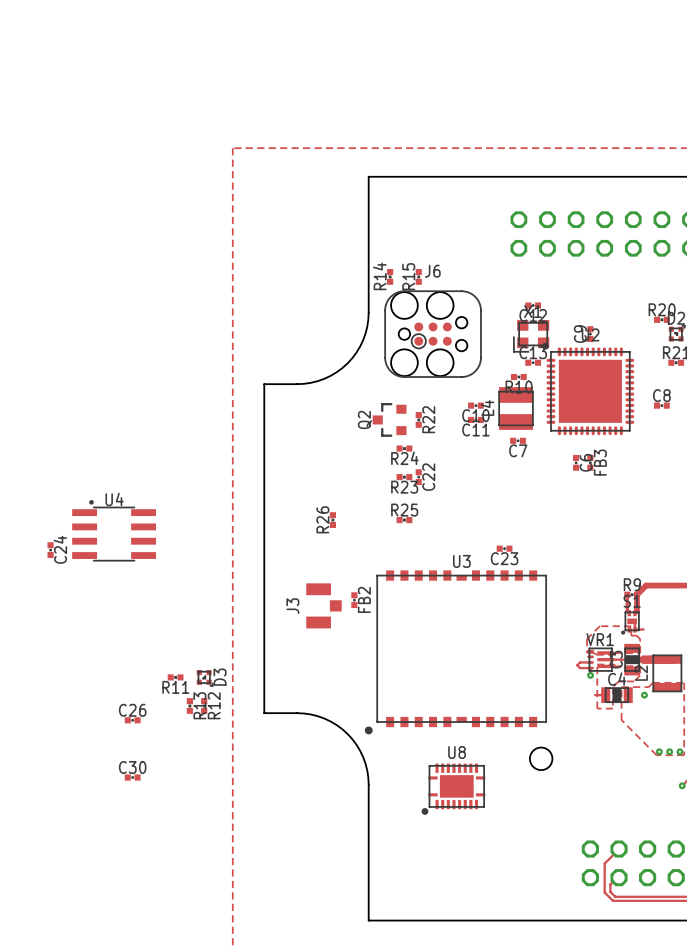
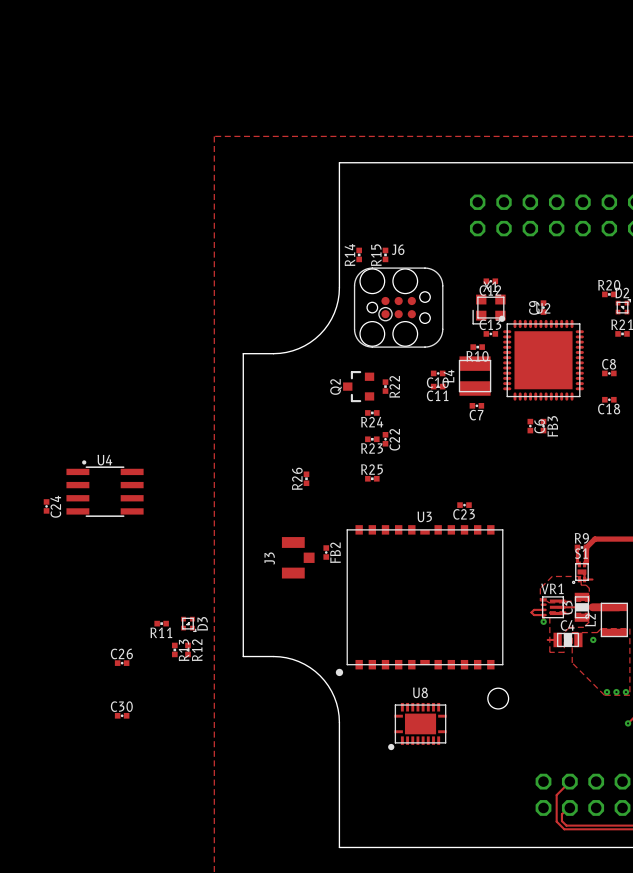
C18: none -> (609, 399)

